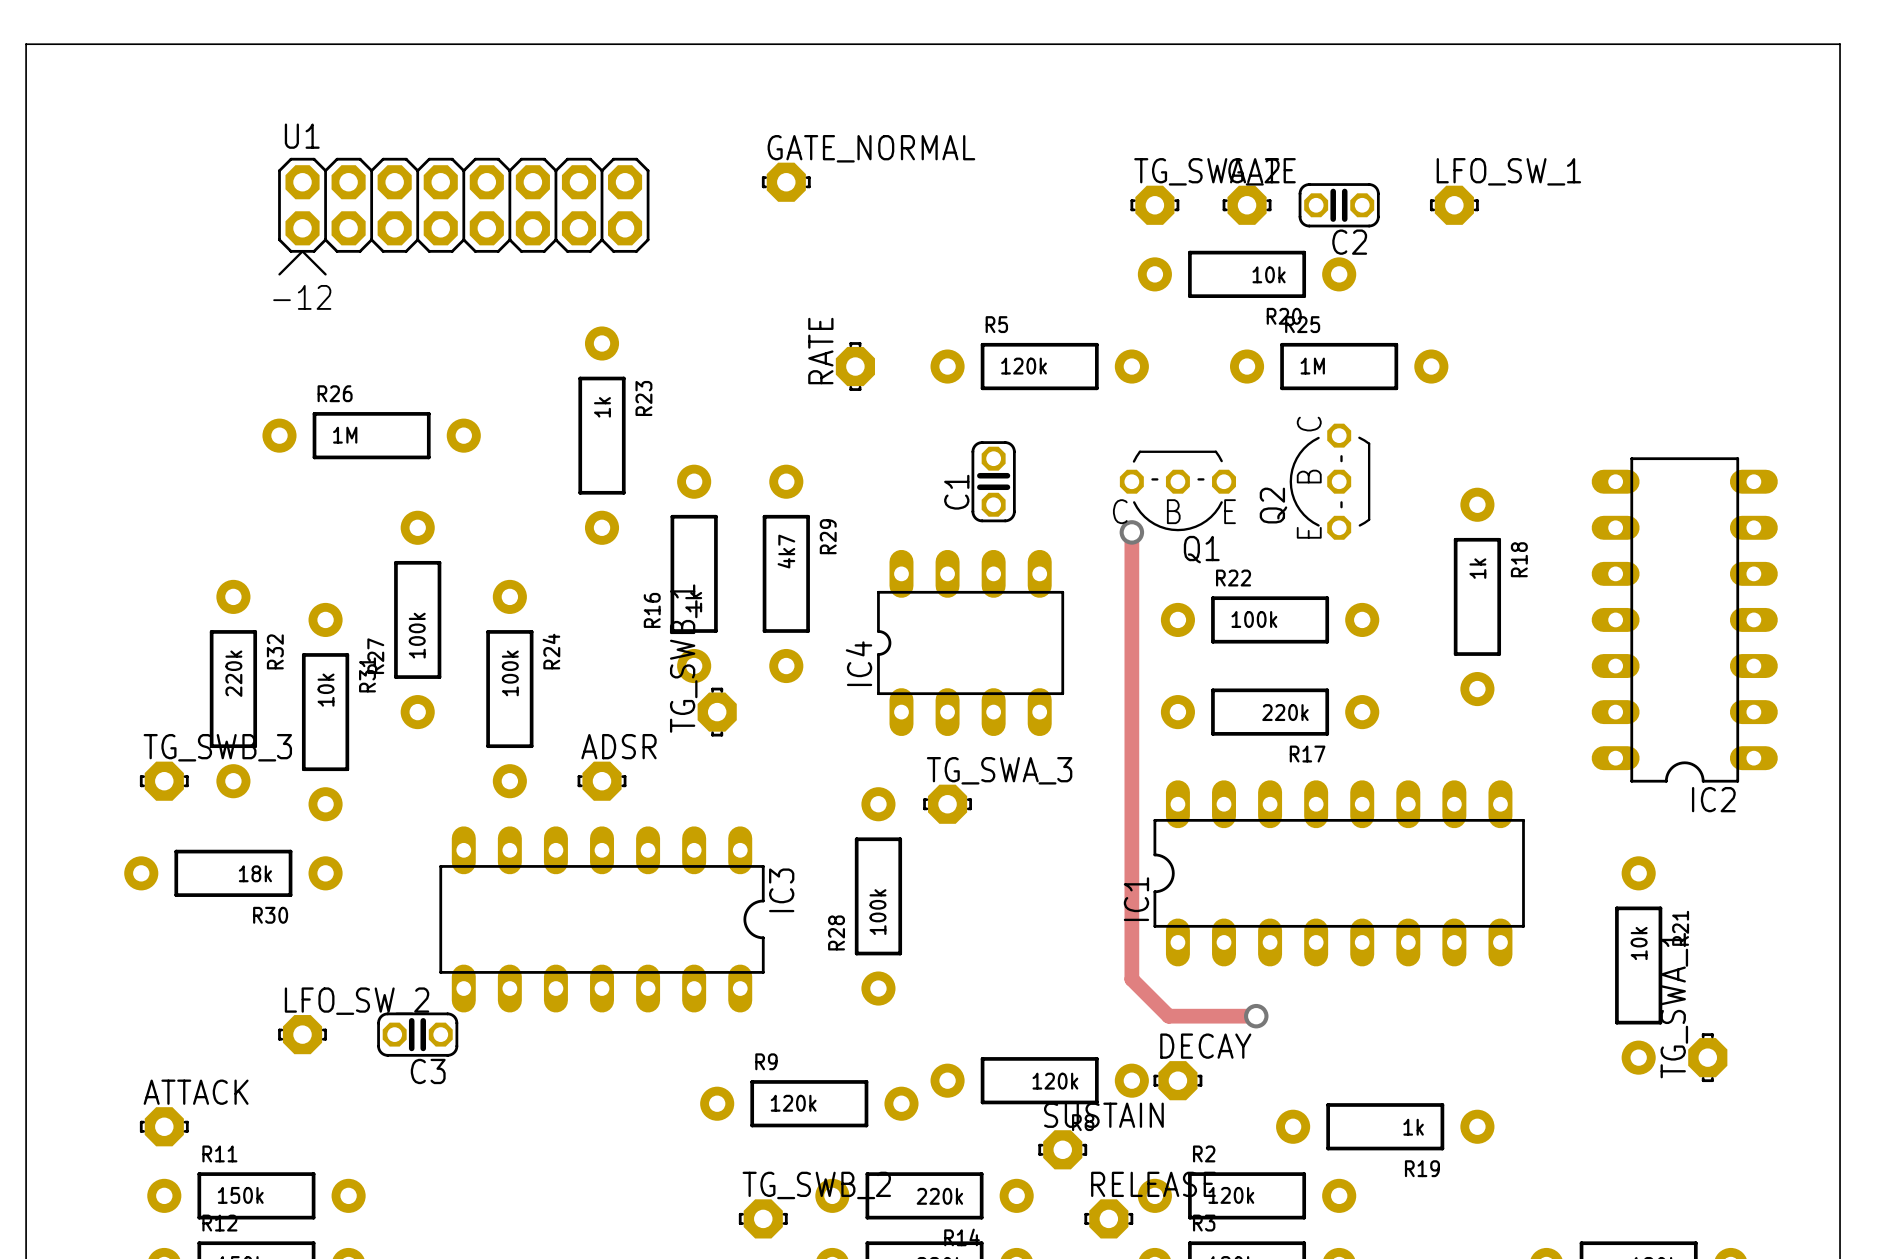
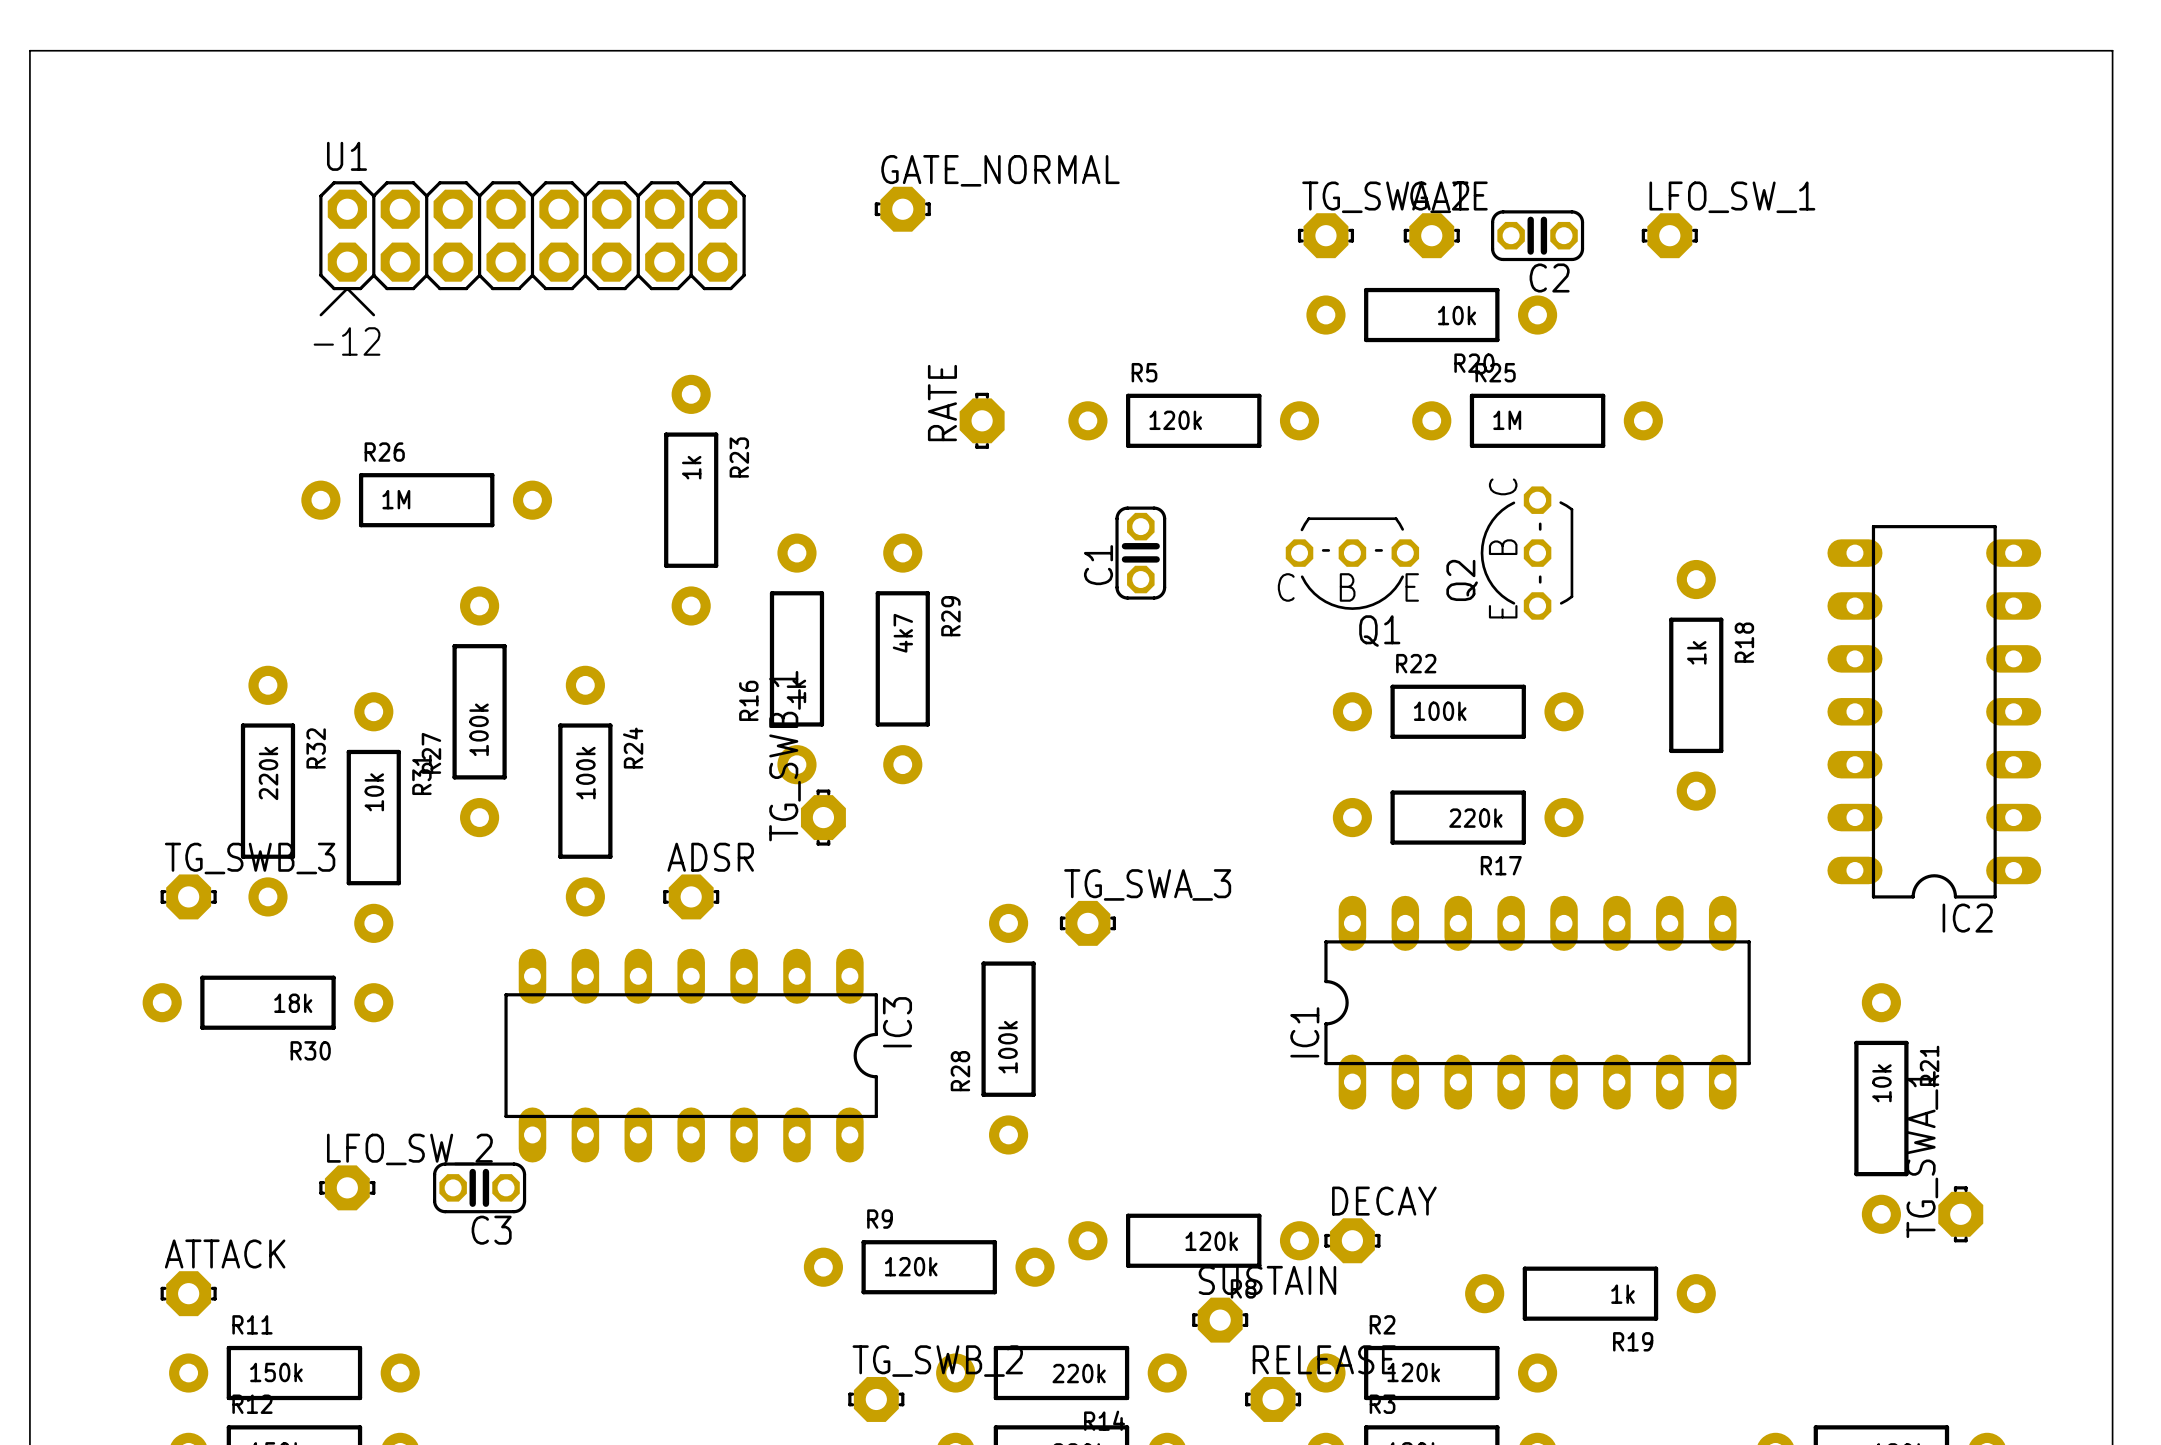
track: (1131, 532) (1131, 979) (1168, 1016) (1256, 1016) -> none
via: (1131, 532) -> none
IC4: (970, 642) -> none
via: (1256, 1016) -> none

